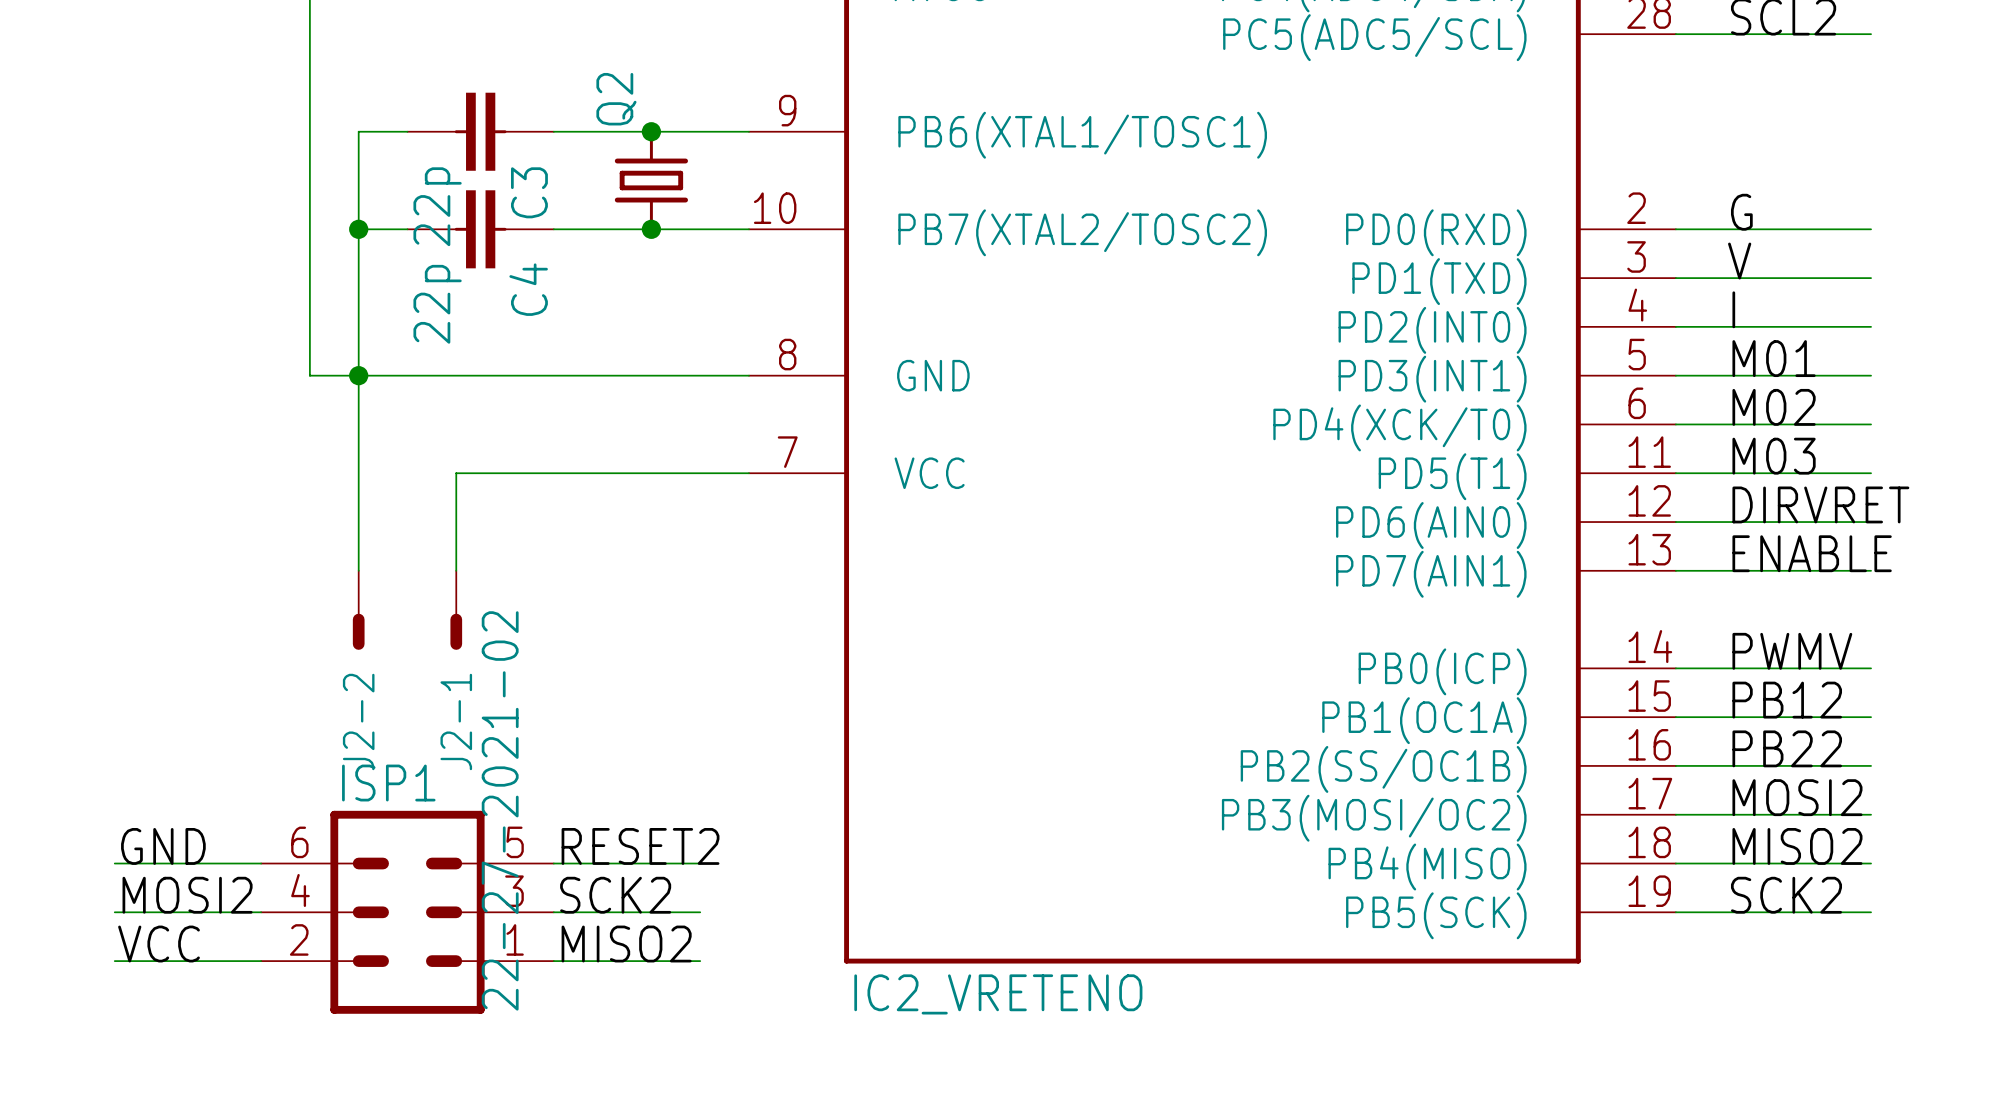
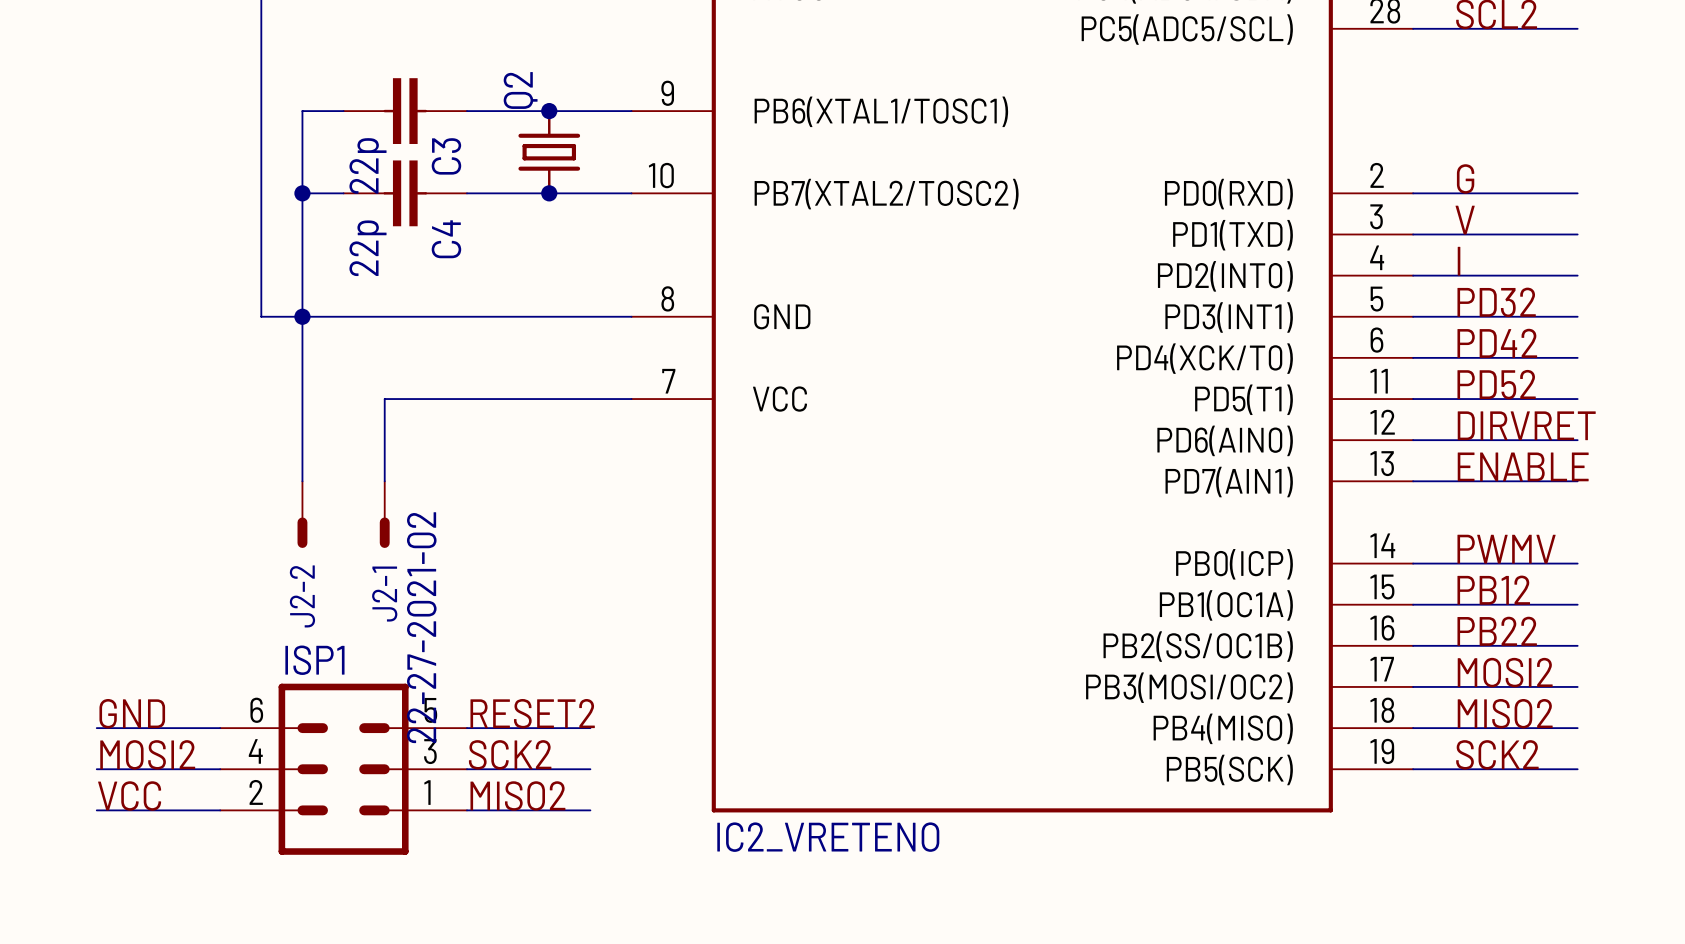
label: M01 (1774, 358) -> PD32 (1496, 302)
label: M02 (1774, 407) -> PD42 (1497, 343)
label: M03 (1774, 456) -> PD52 (1496, 384)

